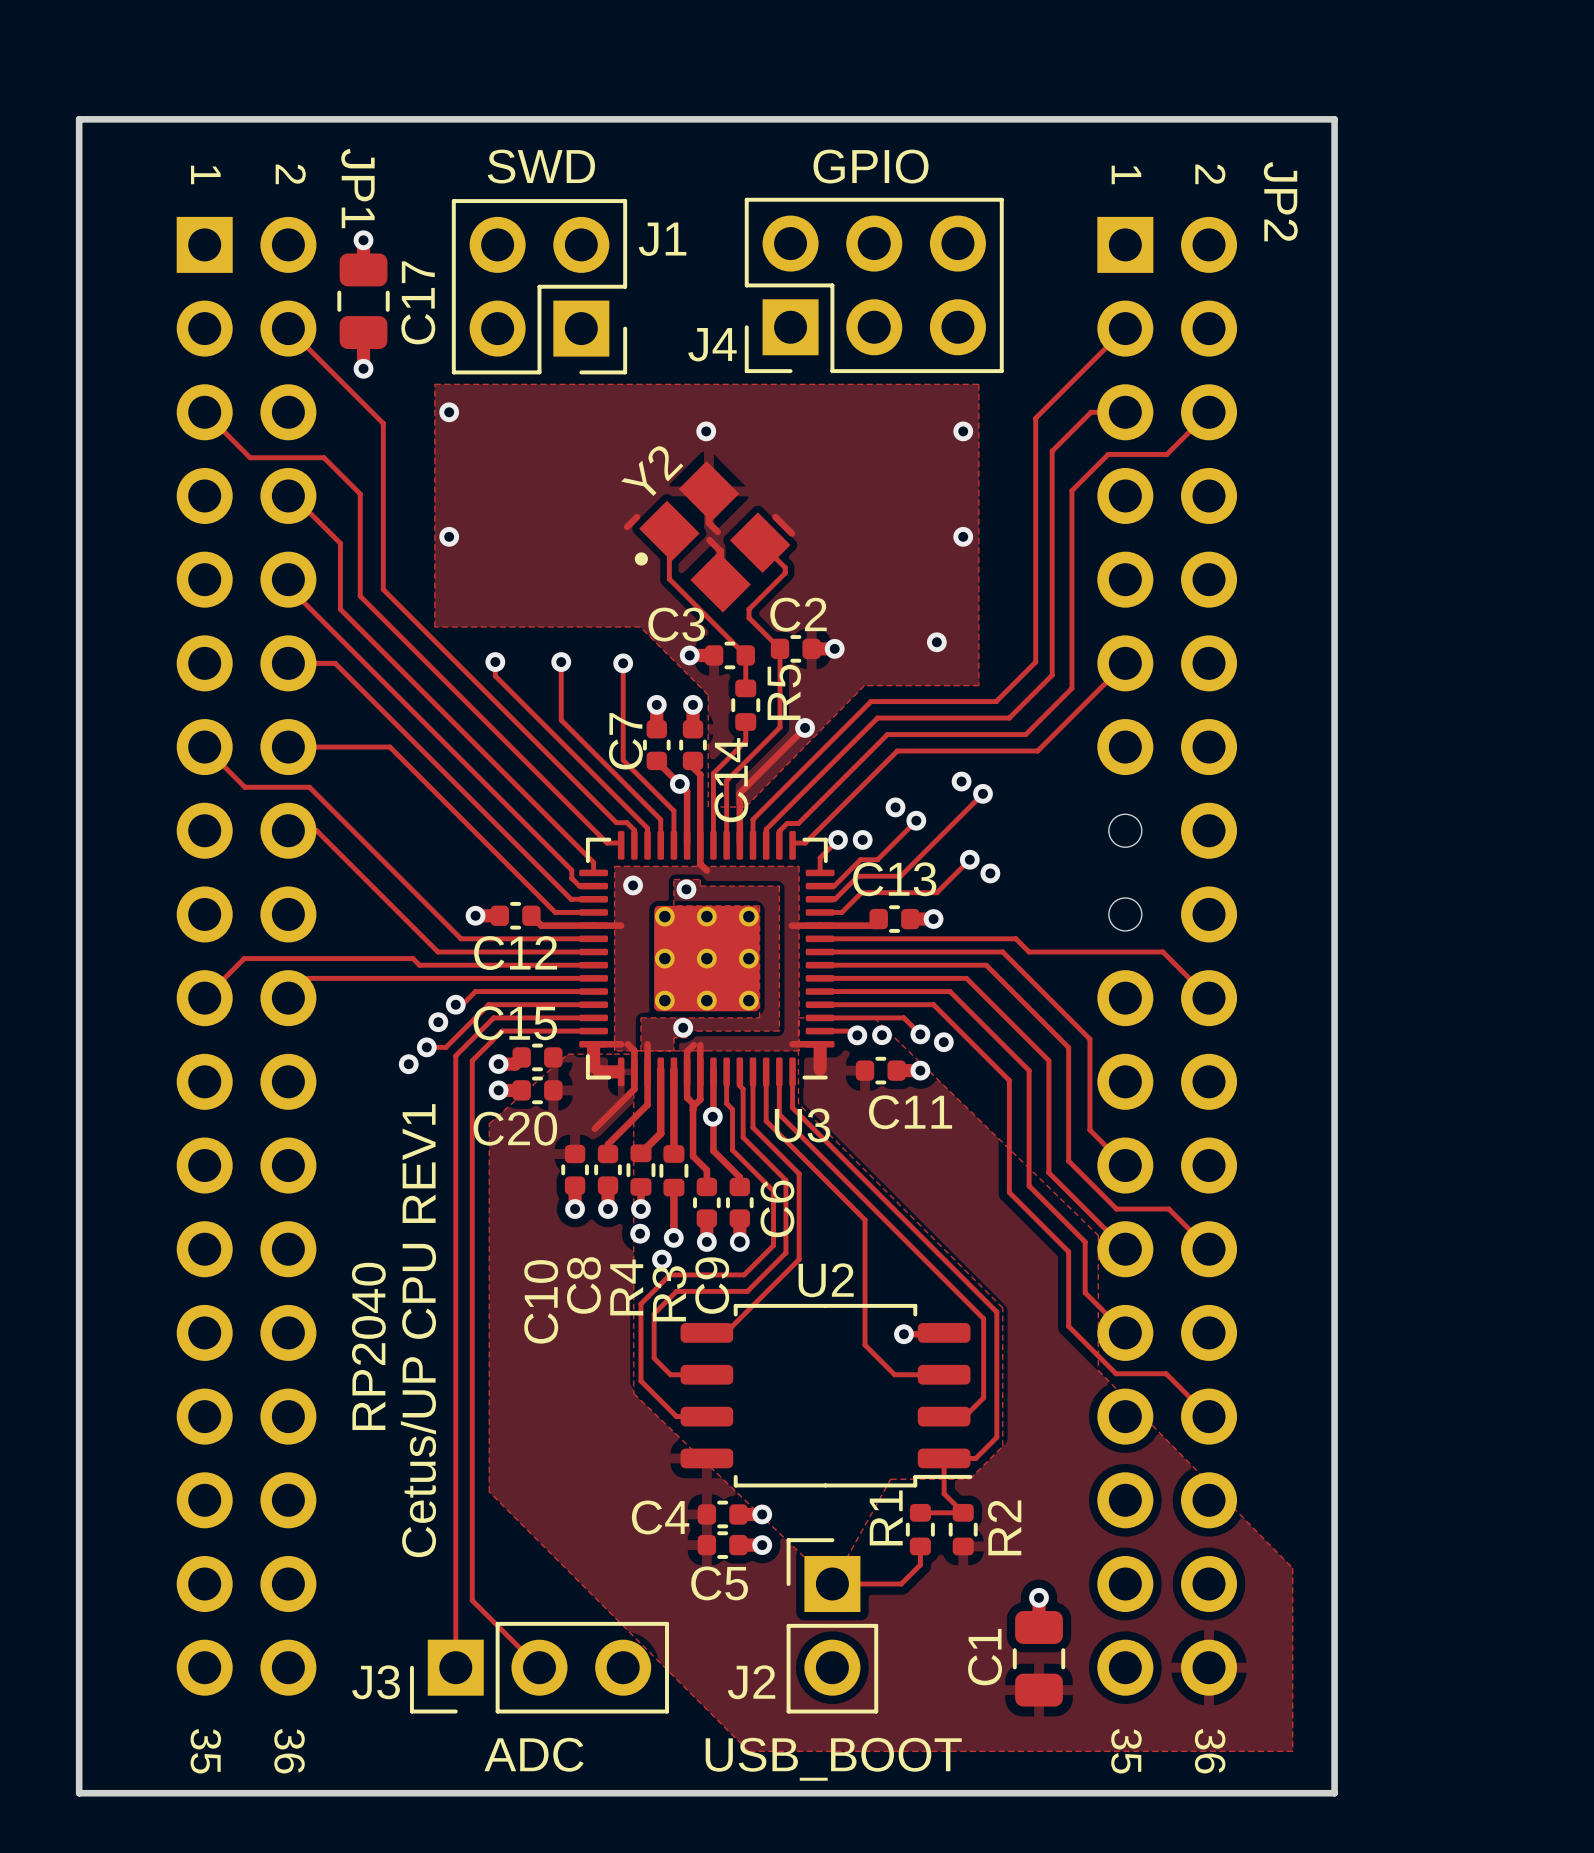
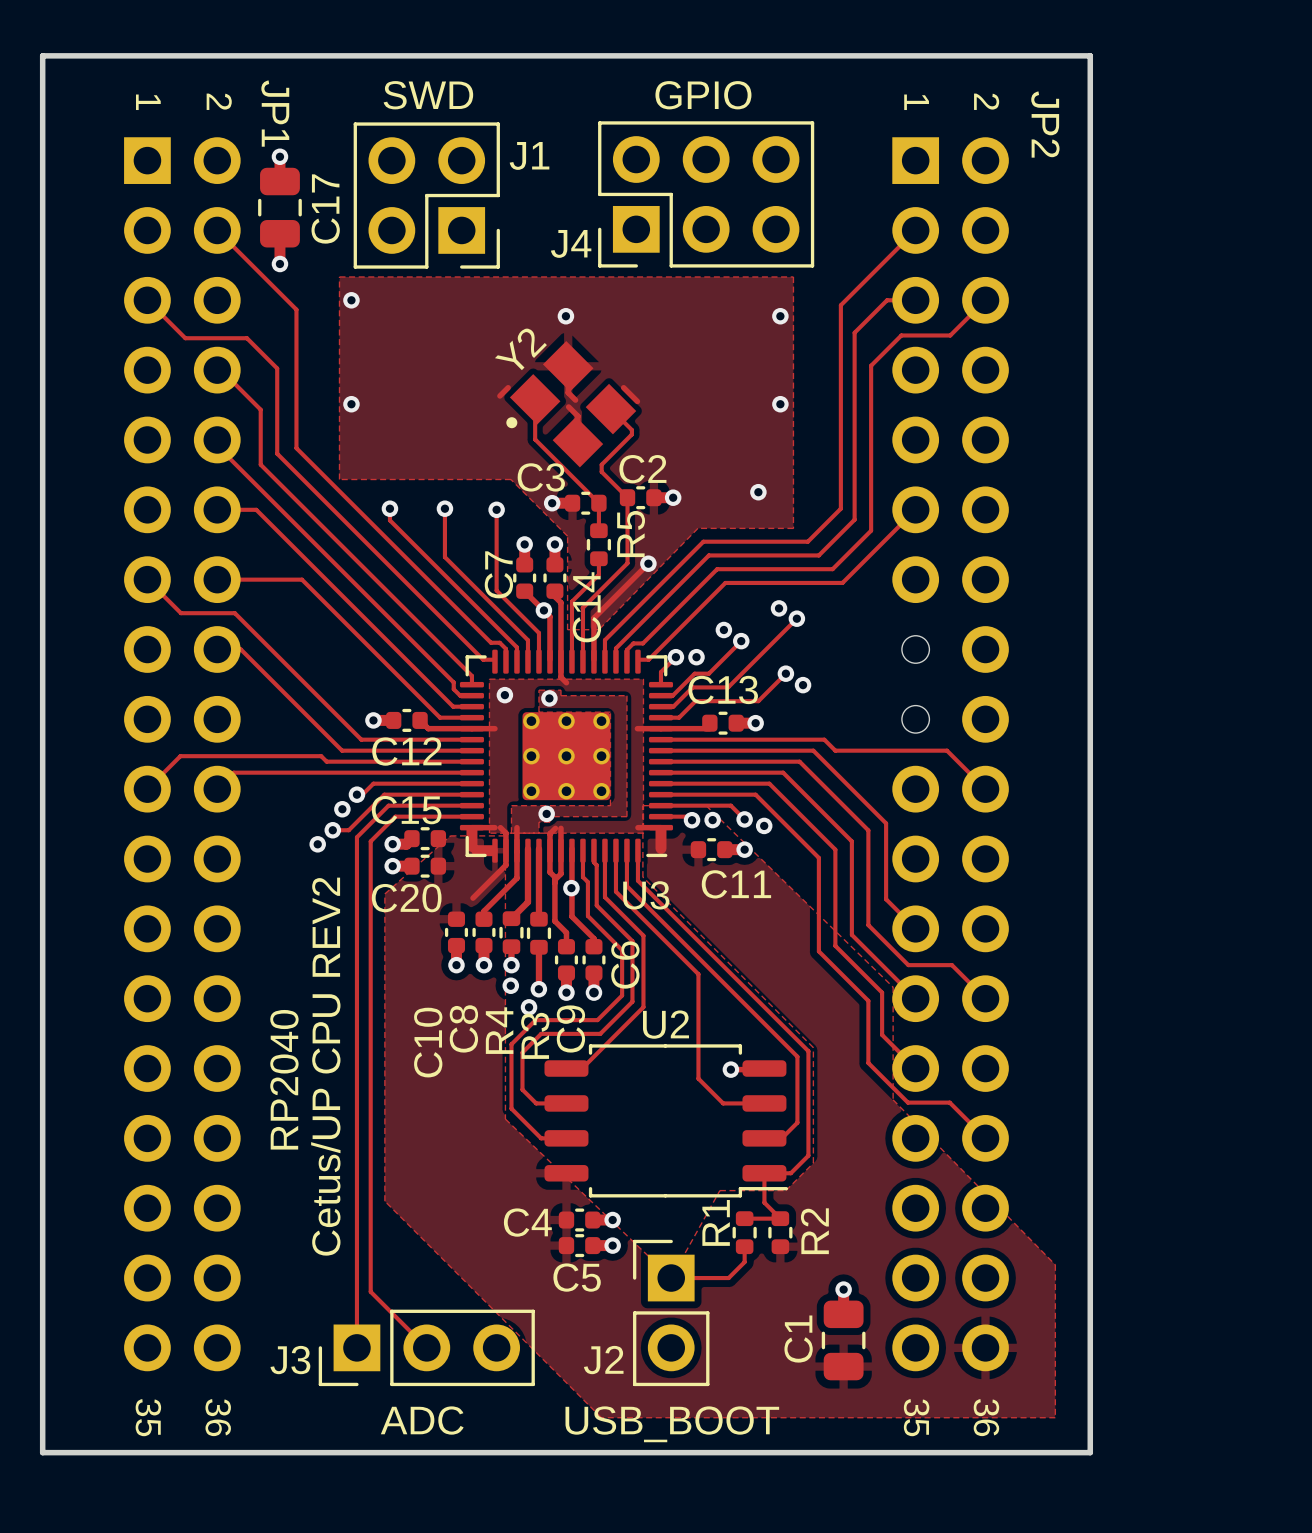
text: Cetus/UP CPU REV1 (418, 1330) -> Cetus/UP CPU REV2 (325, 1066)

